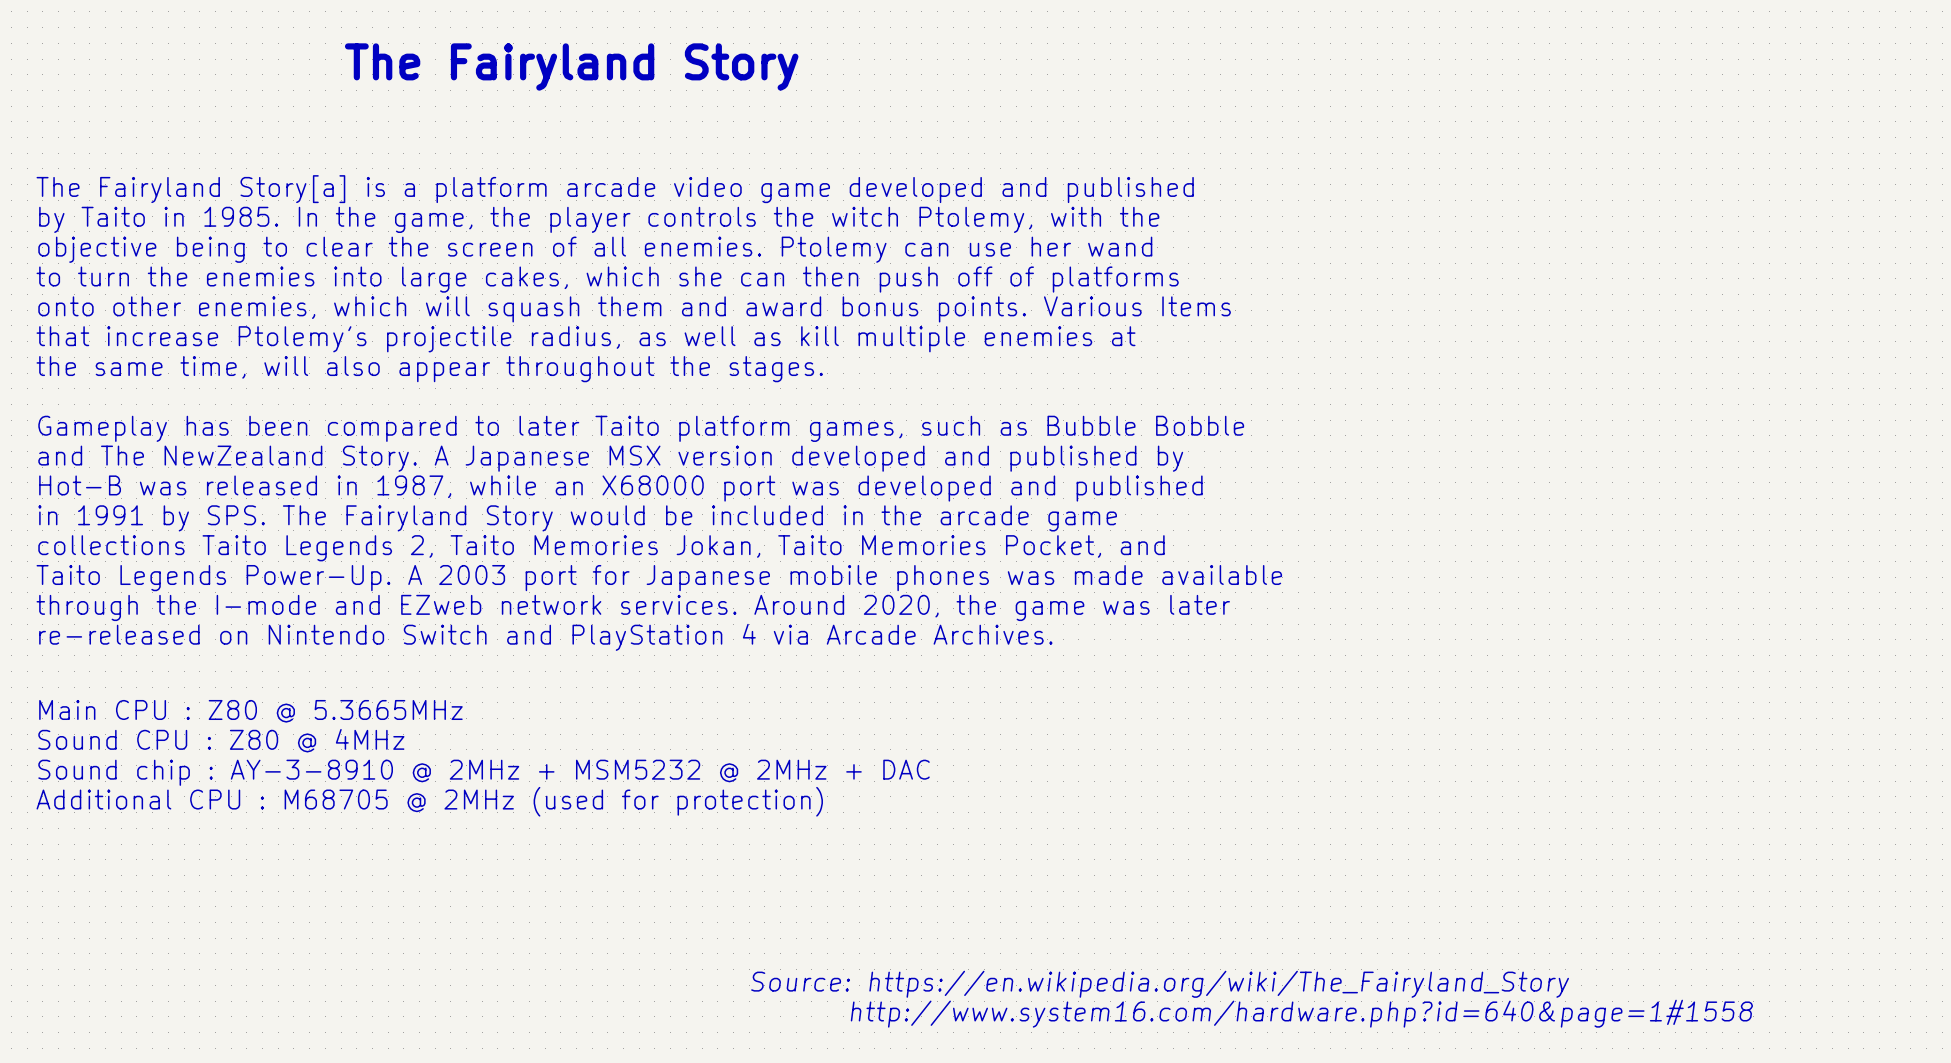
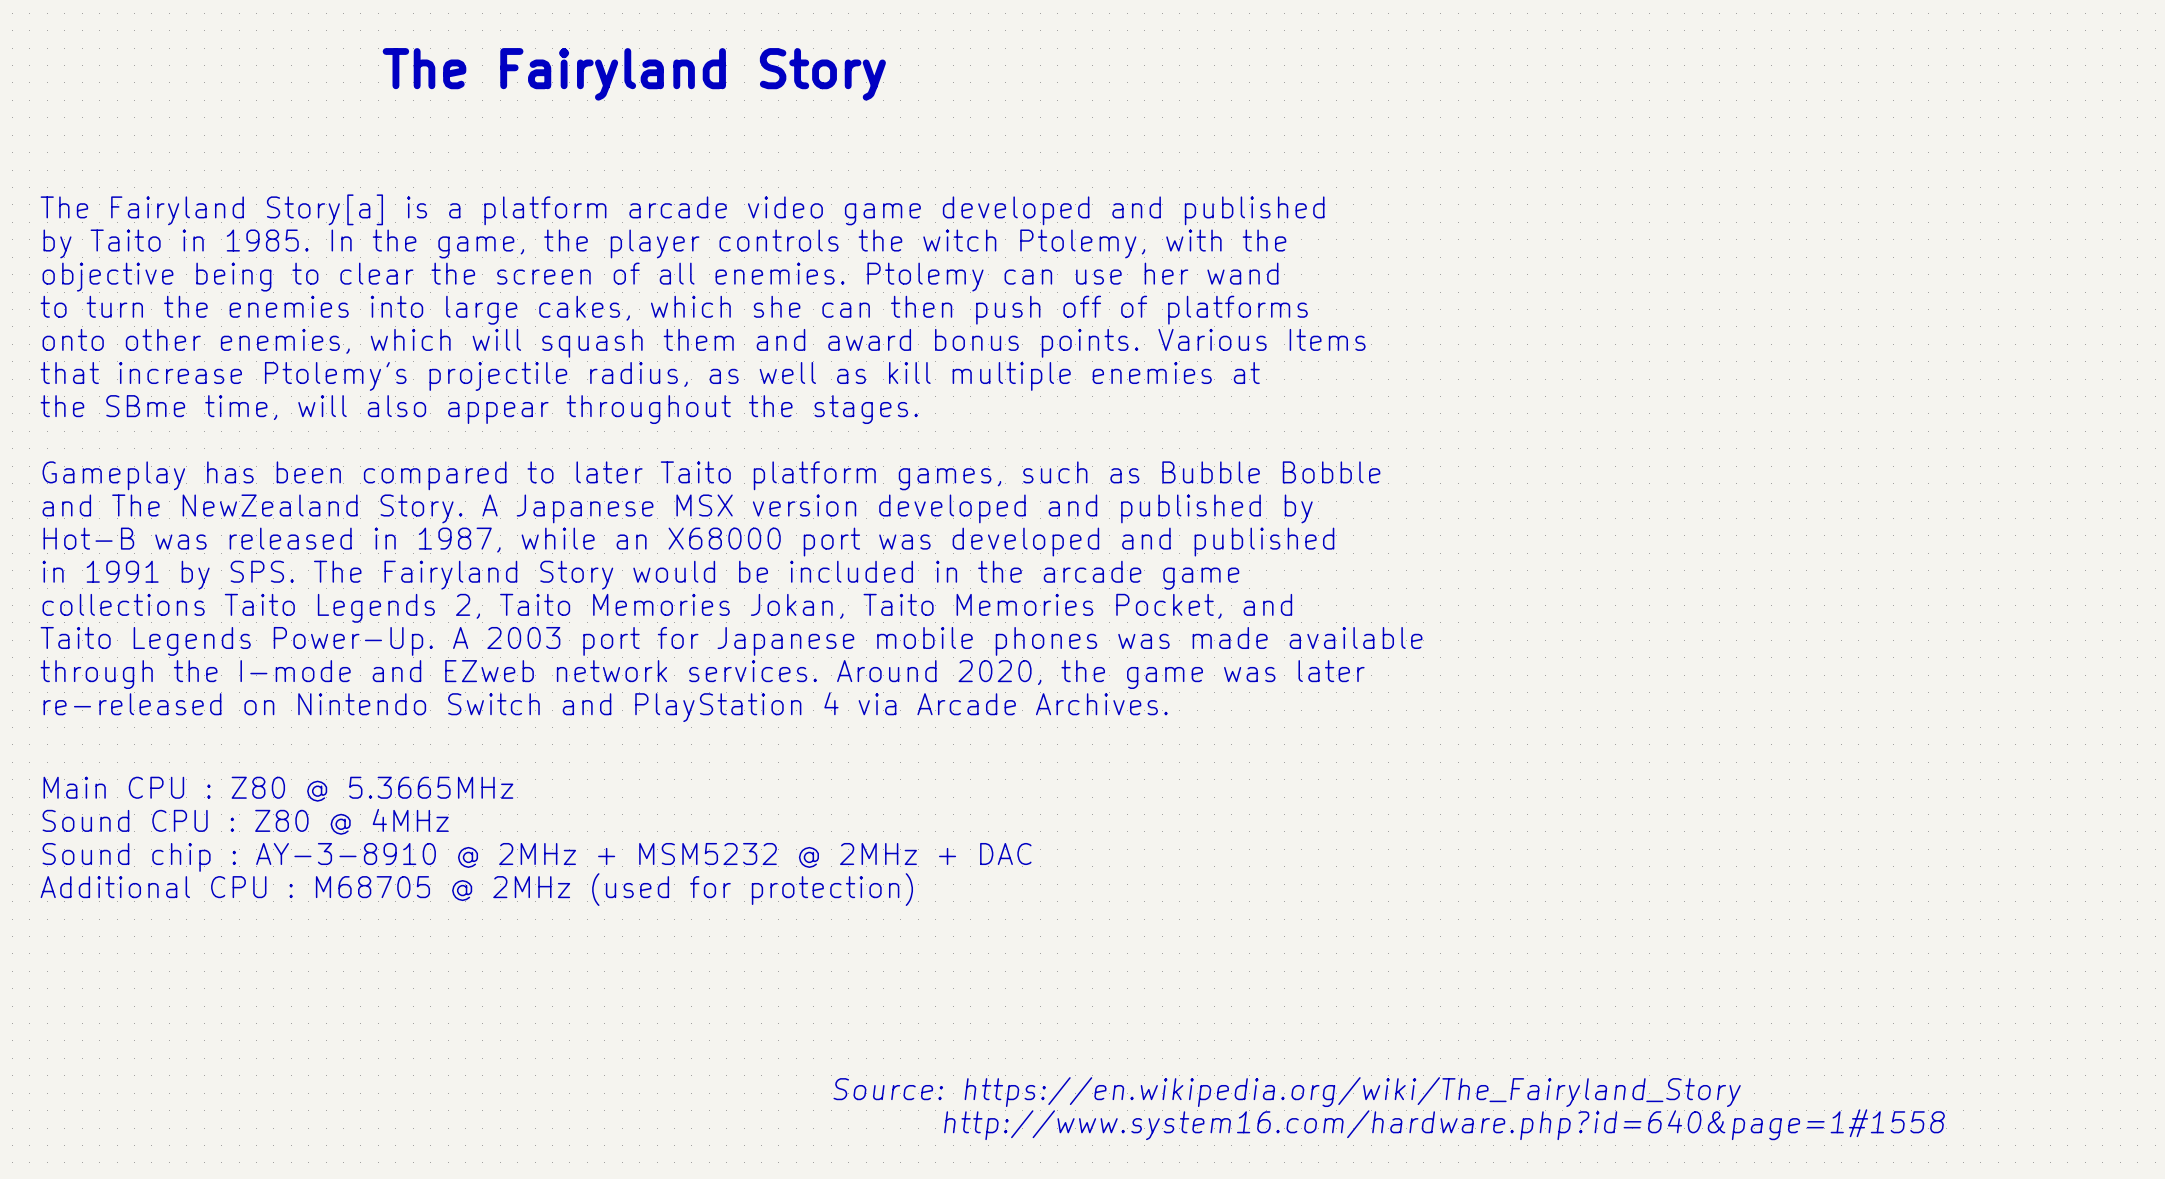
text: the same time, will also appear throughout the stages. (429, 369) -> the SBme time, will also appear throughout the stages. (479, 409)

